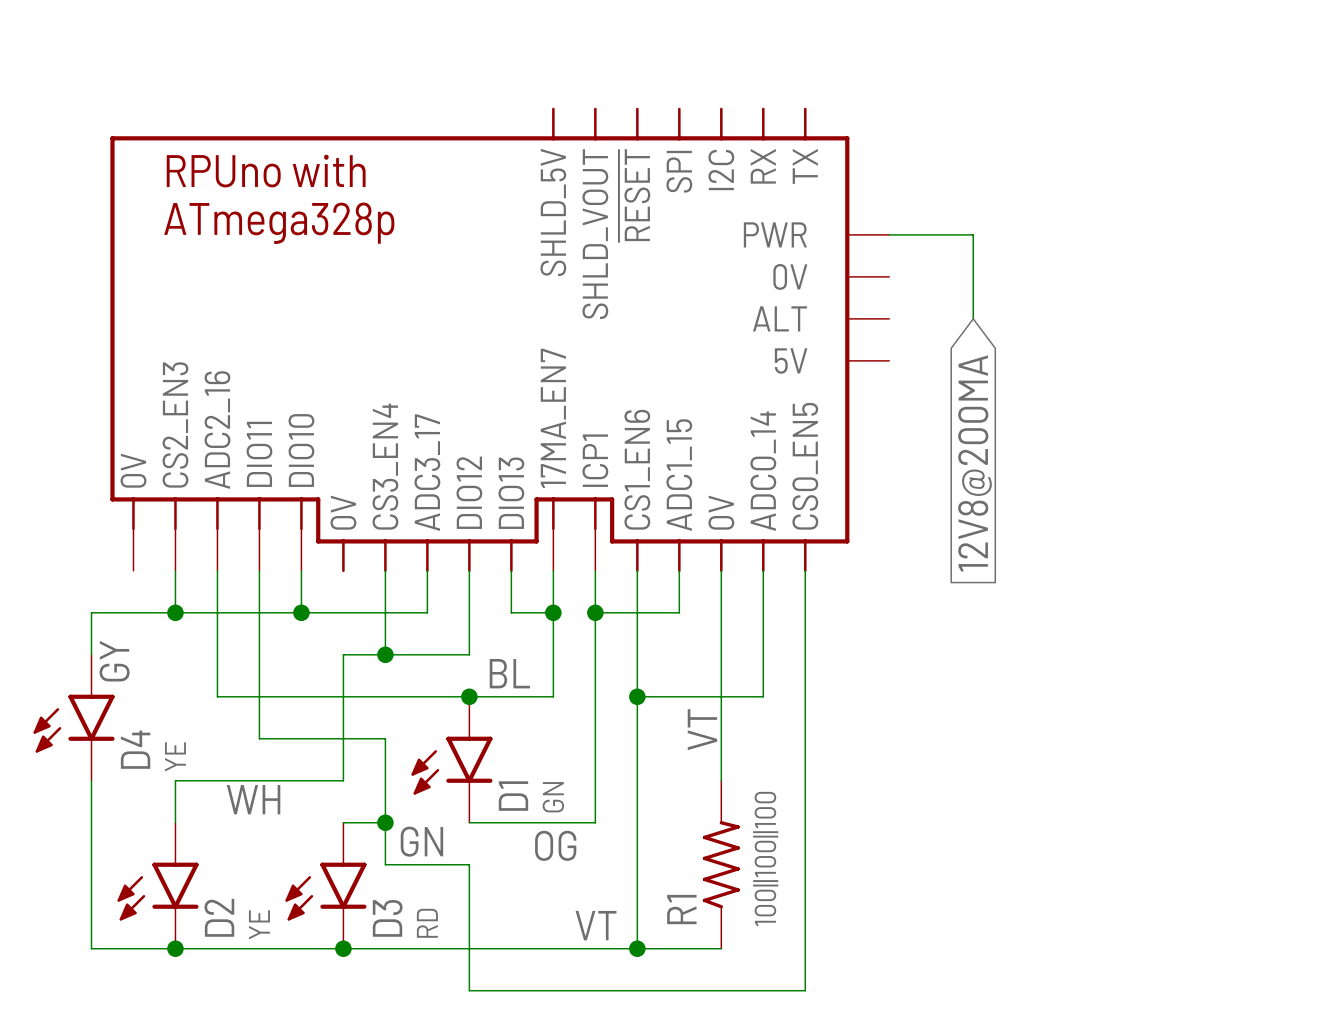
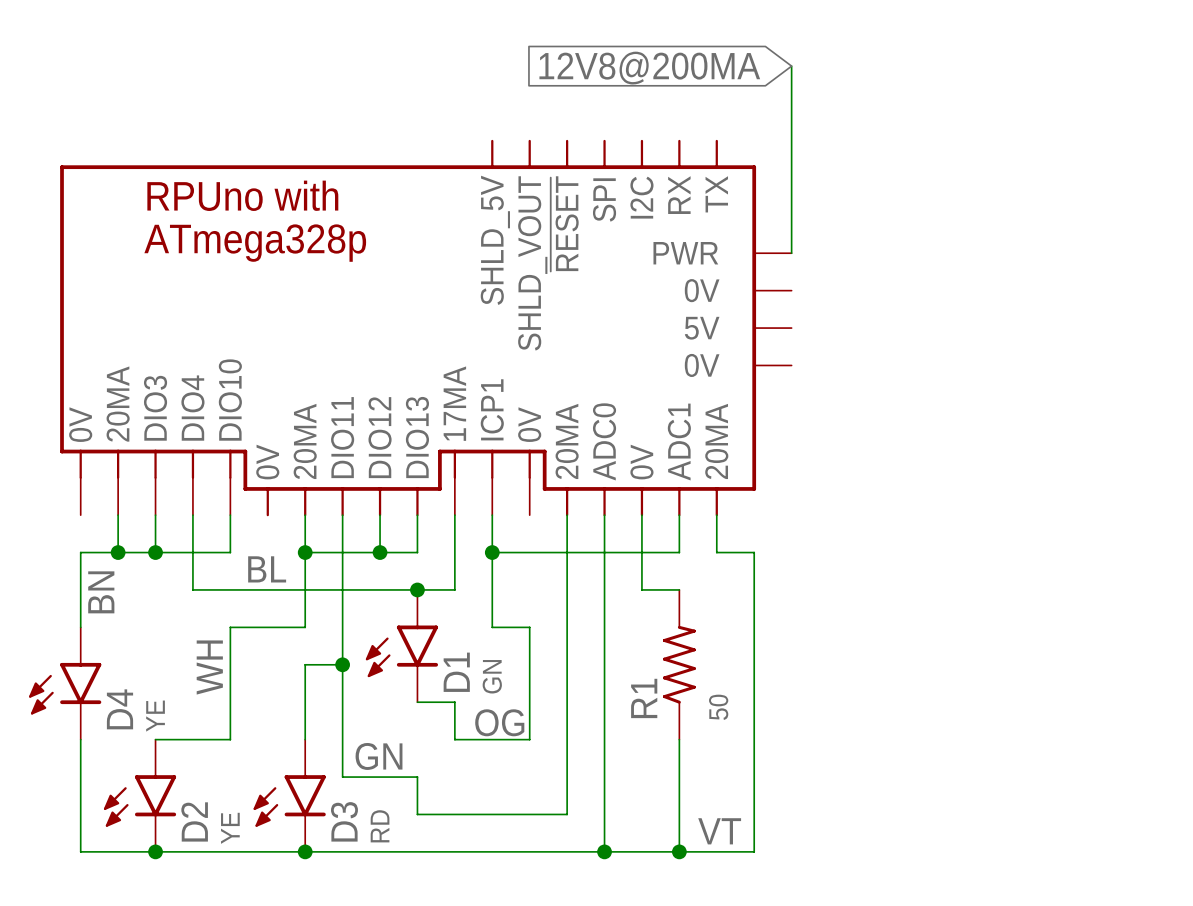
wire: none -> (791, 66) (791, 253)
wire: (889, 234) (973, 234) (973, 318) -> none
part: (499, 339) -> none
part: none -> (425, 328)
global label rotation: 0° (974, 463) -> 90° clockwise (649, 68)
global label position: 12V8@200MA (974, 463) -> 12V8@200MA (649, 68)
wire: (301, 570) (301, 612) -> (118, 515) (118, 552)
wire: (595, 570) (595, 696) -> (492, 627) (529, 627)
junction: none -> (118, 552)
junction: (301, 612) -> none
wire: (343, 612) (259, 612) (259, 696) (217, 696) (217, 654) -> (305, 515) (305, 589) (192, 589)
junction: none -> (305, 552)
wire: none -> (380, 552) (417, 552)
junction: none -> (380, 552)
wire: (469, 612) (469, 654) -> (454, 552) (454, 589) (417, 589)
wire: (511, 612) (553, 612) -> (529, 552) (492, 552)
junction: (595, 612) -> none
wire: (763, 612) (763, 696) (637, 696) -> (679, 552) (604, 552) (604, 851)
wire: (805, 612) (805, 990) (469, 990) (469, 906) -> (716, 552) (754, 552) (754, 851) (641, 851)
wire: none -> (342, 589) (342, 664)
junction: (385, 654) -> none
junction: none -> (417, 589)
wire: (721, 654) (721, 780) -> (641, 589) (679, 589)
label: GY (114, 661) -> BN (101, 592)
label position: BL (509, 673) -> BL (267, 569)
junction: (469, 696) -> none
wire: (553, 696) (343, 696) (343, 738) (259, 738) -> none
junction: (637, 696) -> none
D4 position: (74, 717) -> (65, 683)
label: VT (702, 729) -> none
junction: none -> (342, 664)
D1 position: (451, 759) -> (401, 646)
wire: (343, 780) (175, 780) (175, 822) -> (230, 664) (230, 739) (155, 739)
label rotation: 0° (253, 799) -> 90° counterclockwise (209, 667)
wire: (343, 822) (385, 822) -> (305, 739) (305, 702)
junction: (385, 822) -> none
wire: (469, 822) (511, 822) -> (417, 702) (454, 702) (454, 739)
wire: none -> (679, 739) (679, 851)
label position: OG (555, 845) -> OG (499, 722)
R1 value: 100||100||100 (765, 859) -> 50 (718, 707)
R1 position: (721, 864) -> (679, 664)
wire: (637, 906) (637, 948) -> (567, 814) (417, 814)
label: VT (596, 925) -> none
label: none -> VT (719, 831)
junction position: (637, 948) -> (604, 851)
junction: none -> (679, 851)

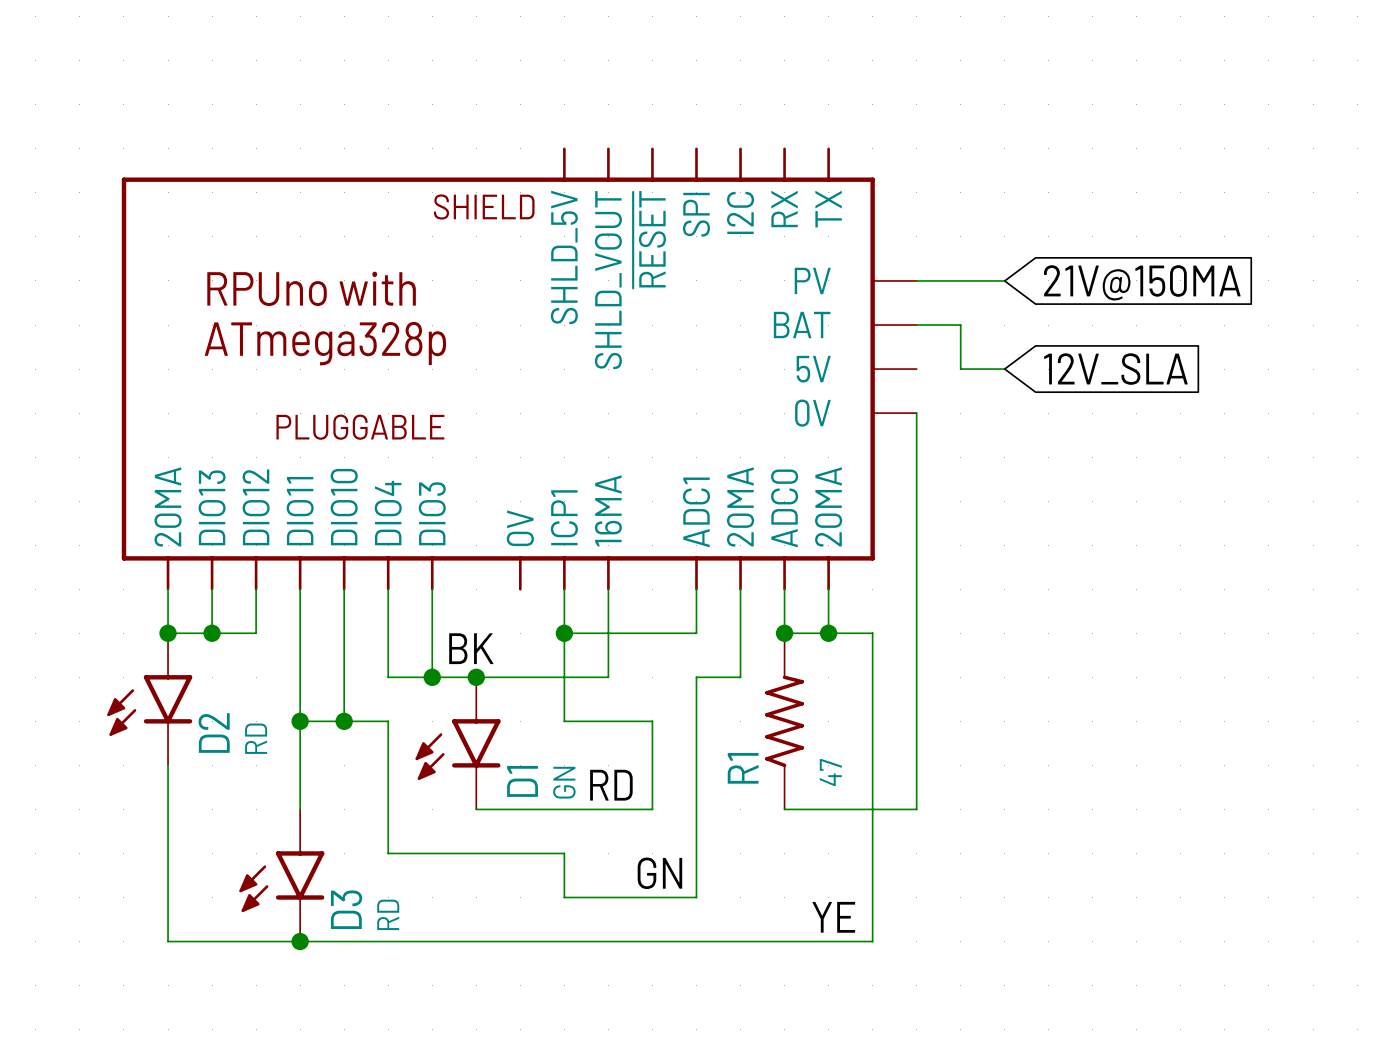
wire: (791, 66) (791, 253) -> (1004, 280) (916, 280)
global label: 12V8@200MA (649, 68) -> none
global label: none -> 21V@150MA (1142, 282)
wire: none -> (916, 325) (960, 325) (960, 369) (1004, 369)
part: (425, 328) -> none
part: none -> (519, 369)
global label: none -> 12V_SLA (1115, 369)
wire: none -> (916, 413) (916, 809) (784, 809)
wire: (118, 515) (118, 552) -> (432, 633) (432, 677)
wire: none -> (300, 589) (300, 809)
wire: (417, 515) (417, 552) (305, 552) -> none
wire: (454, 515) (454, 589) -> (608, 589) (608, 677) (520, 677)
wire: (567, 515) (567, 627) -> (608, 721) (652, 721)
junction: (118, 552) -> none
wire: (155, 552) (80, 552) (80, 627) -> none
wire: (192, 552) (192, 589) (342, 589) (342, 627) -> (344, 721) (388, 721)
junction: none -> (212, 633)
junction: (305, 552) -> none
junction position: (380, 552) -> (432, 677)
wire: (679, 552) (604, 552) (604, 589) -> (740, 677) (696, 677)
junction: none -> (784, 633)
junction: none -> (828, 633)
label: none -> BK (471, 648)
label: BL (267, 569) -> none
wire: (641, 589) (679, 589) -> (784, 633) (828, 633)
label: BN (101, 592) -> none
wire: (267, 627) (230, 627) (230, 739) (155, 739) -> none
junction: none -> (300, 721)
junction: none -> (344, 721)
wire: (529, 627) (529, 739) (492, 739) -> none
wire: none -> (168, 765) (168, 941) (476, 941)
wire: (342, 664) (305, 664) (305, 739) -> none
junction: (342, 664) -> none
R1 position: (679, 664) -> (784, 721)
label: WH (209, 667) -> none
label: none -> RD (611, 785)
D4: YE (65, 683) -> none
wire: (454, 702) (454, 739) -> (520, 809) (652, 809)
wire: (567, 702) (567, 814) -> (872, 941) (652, 941)
R1 value: 50 (718, 707) -> 47 (830, 772)
label: OG (499, 722) -> none
wire: (80, 739) (80, 851) (754, 851) (754, 814) -> none
wire: (342, 739) (342, 777) (417, 777) (417, 814) -> (388, 853) (520, 853)
wire: (679, 739) (679, 851) -> none
label position: GN (379, 756) -> GN (659, 873)
wire: (604, 777) (604, 851) -> (696, 897) (564, 897) (564, 853)
label: none -> YE (833, 917)
D2 position: (140, 795) -> (149, 699)
D3 position: (289, 795) -> (281, 875)
D2 value: YE (230, 828) -> RD (256, 738)
label: VT (719, 831) -> none
junction: (155, 851) -> none
junction position: (305, 851) -> (300, 941)
junction: (604, 851) -> none
junction: (679, 851) -> none

